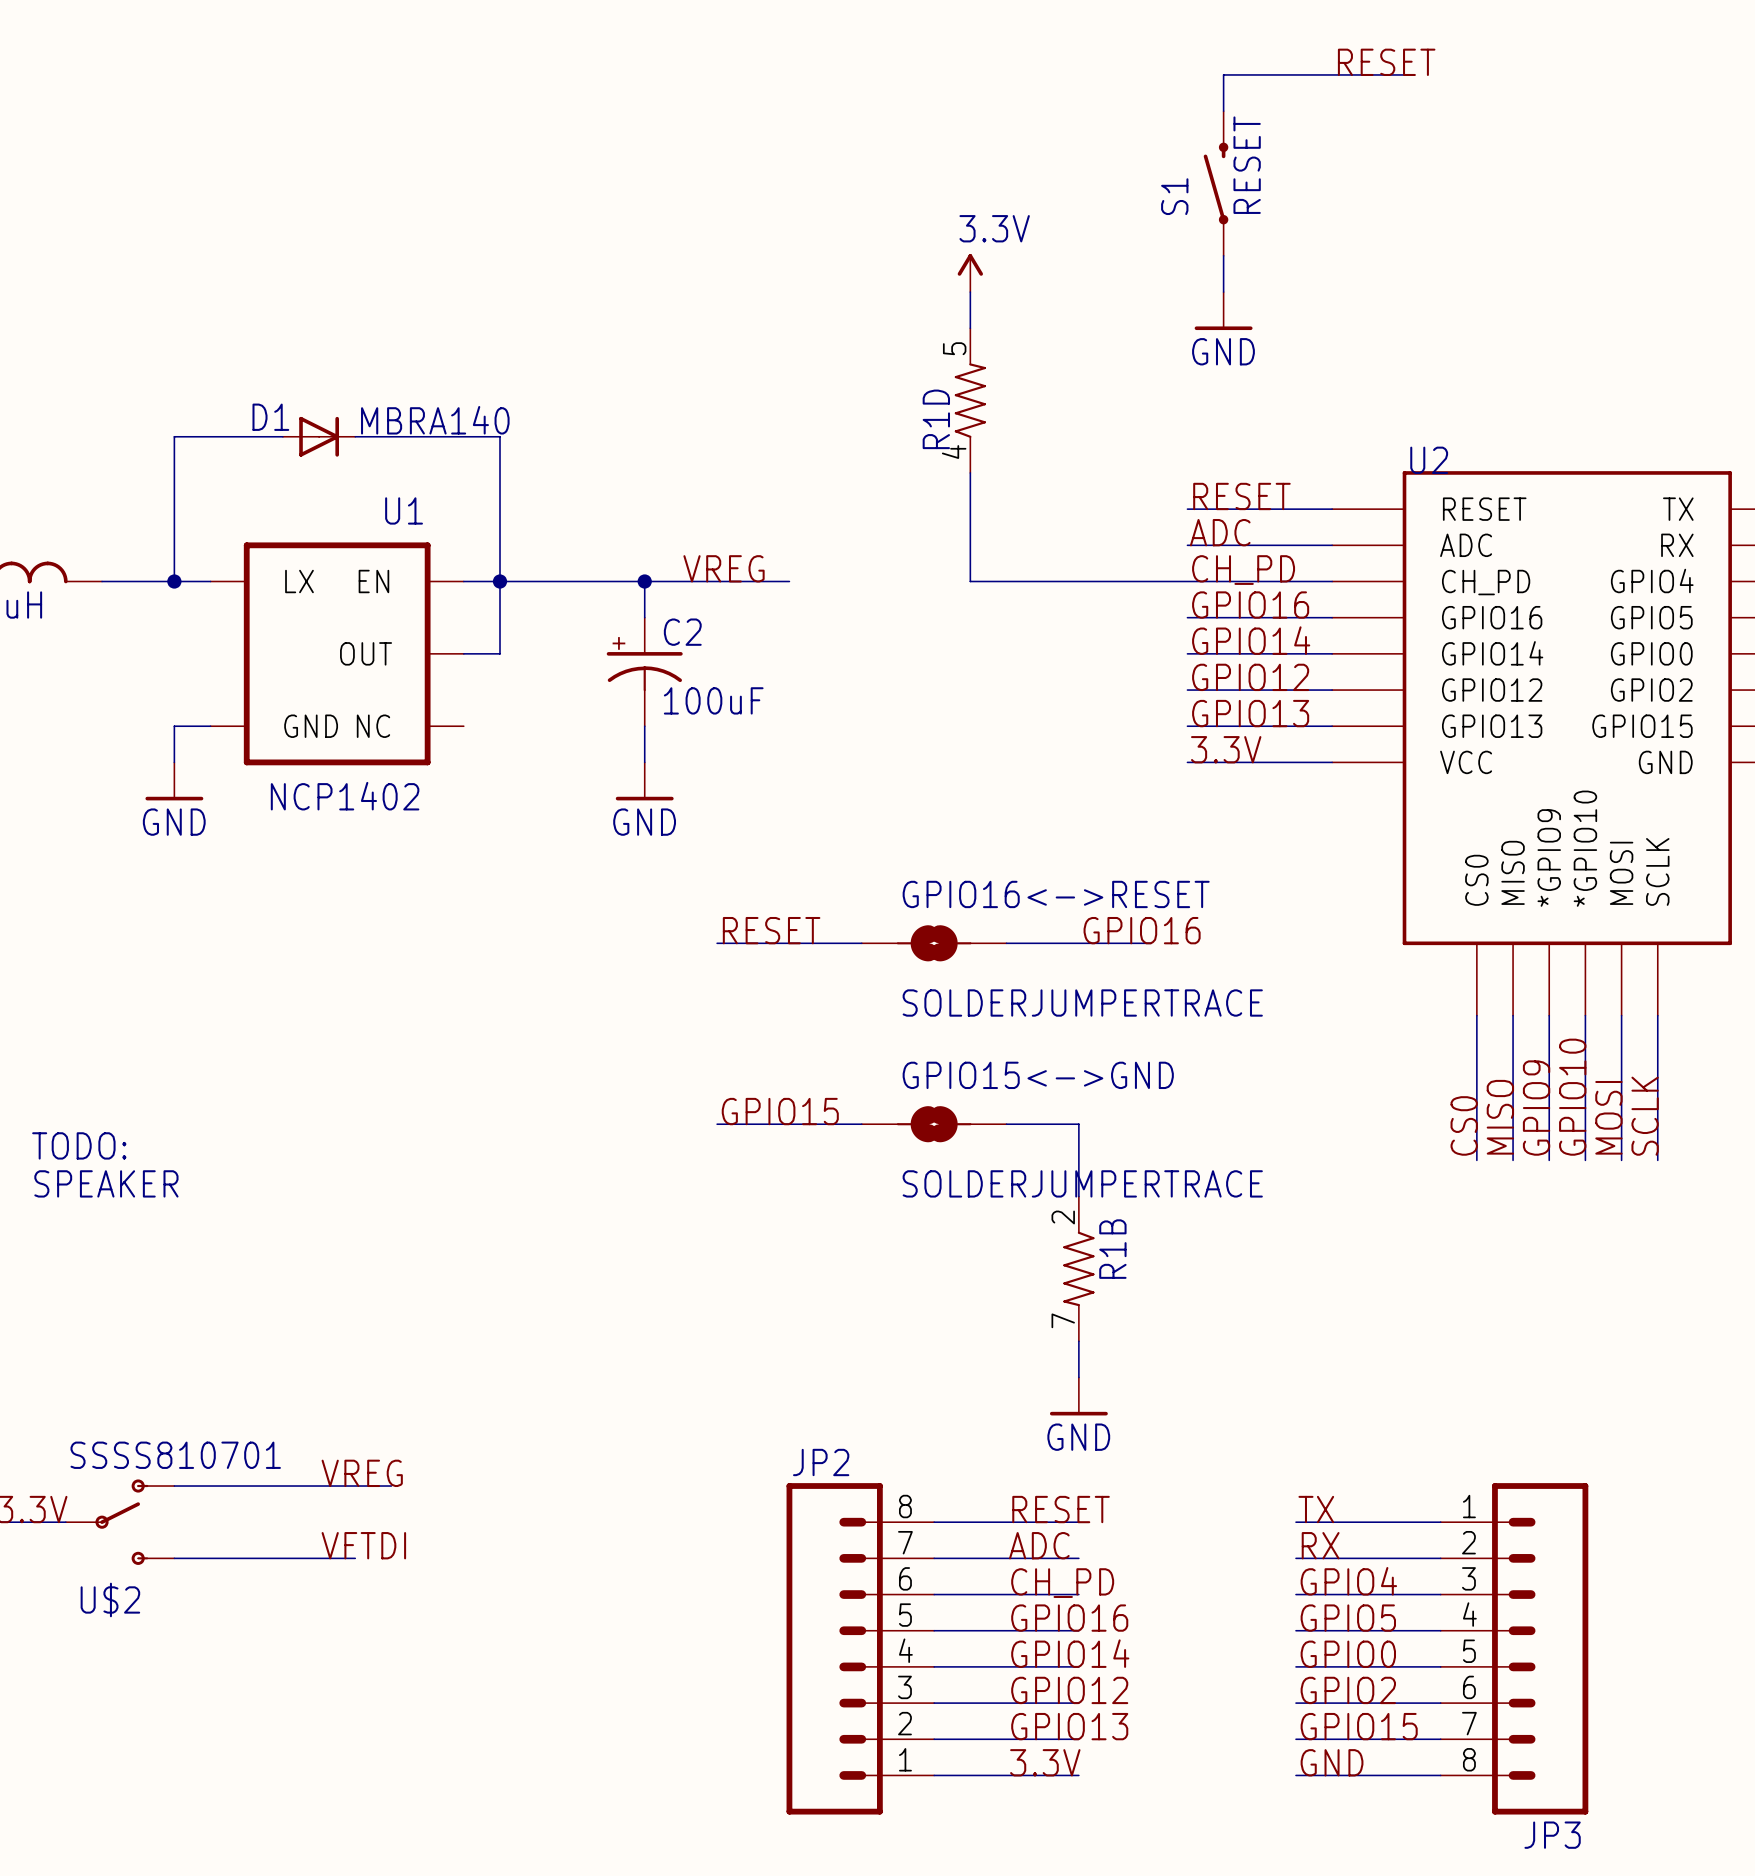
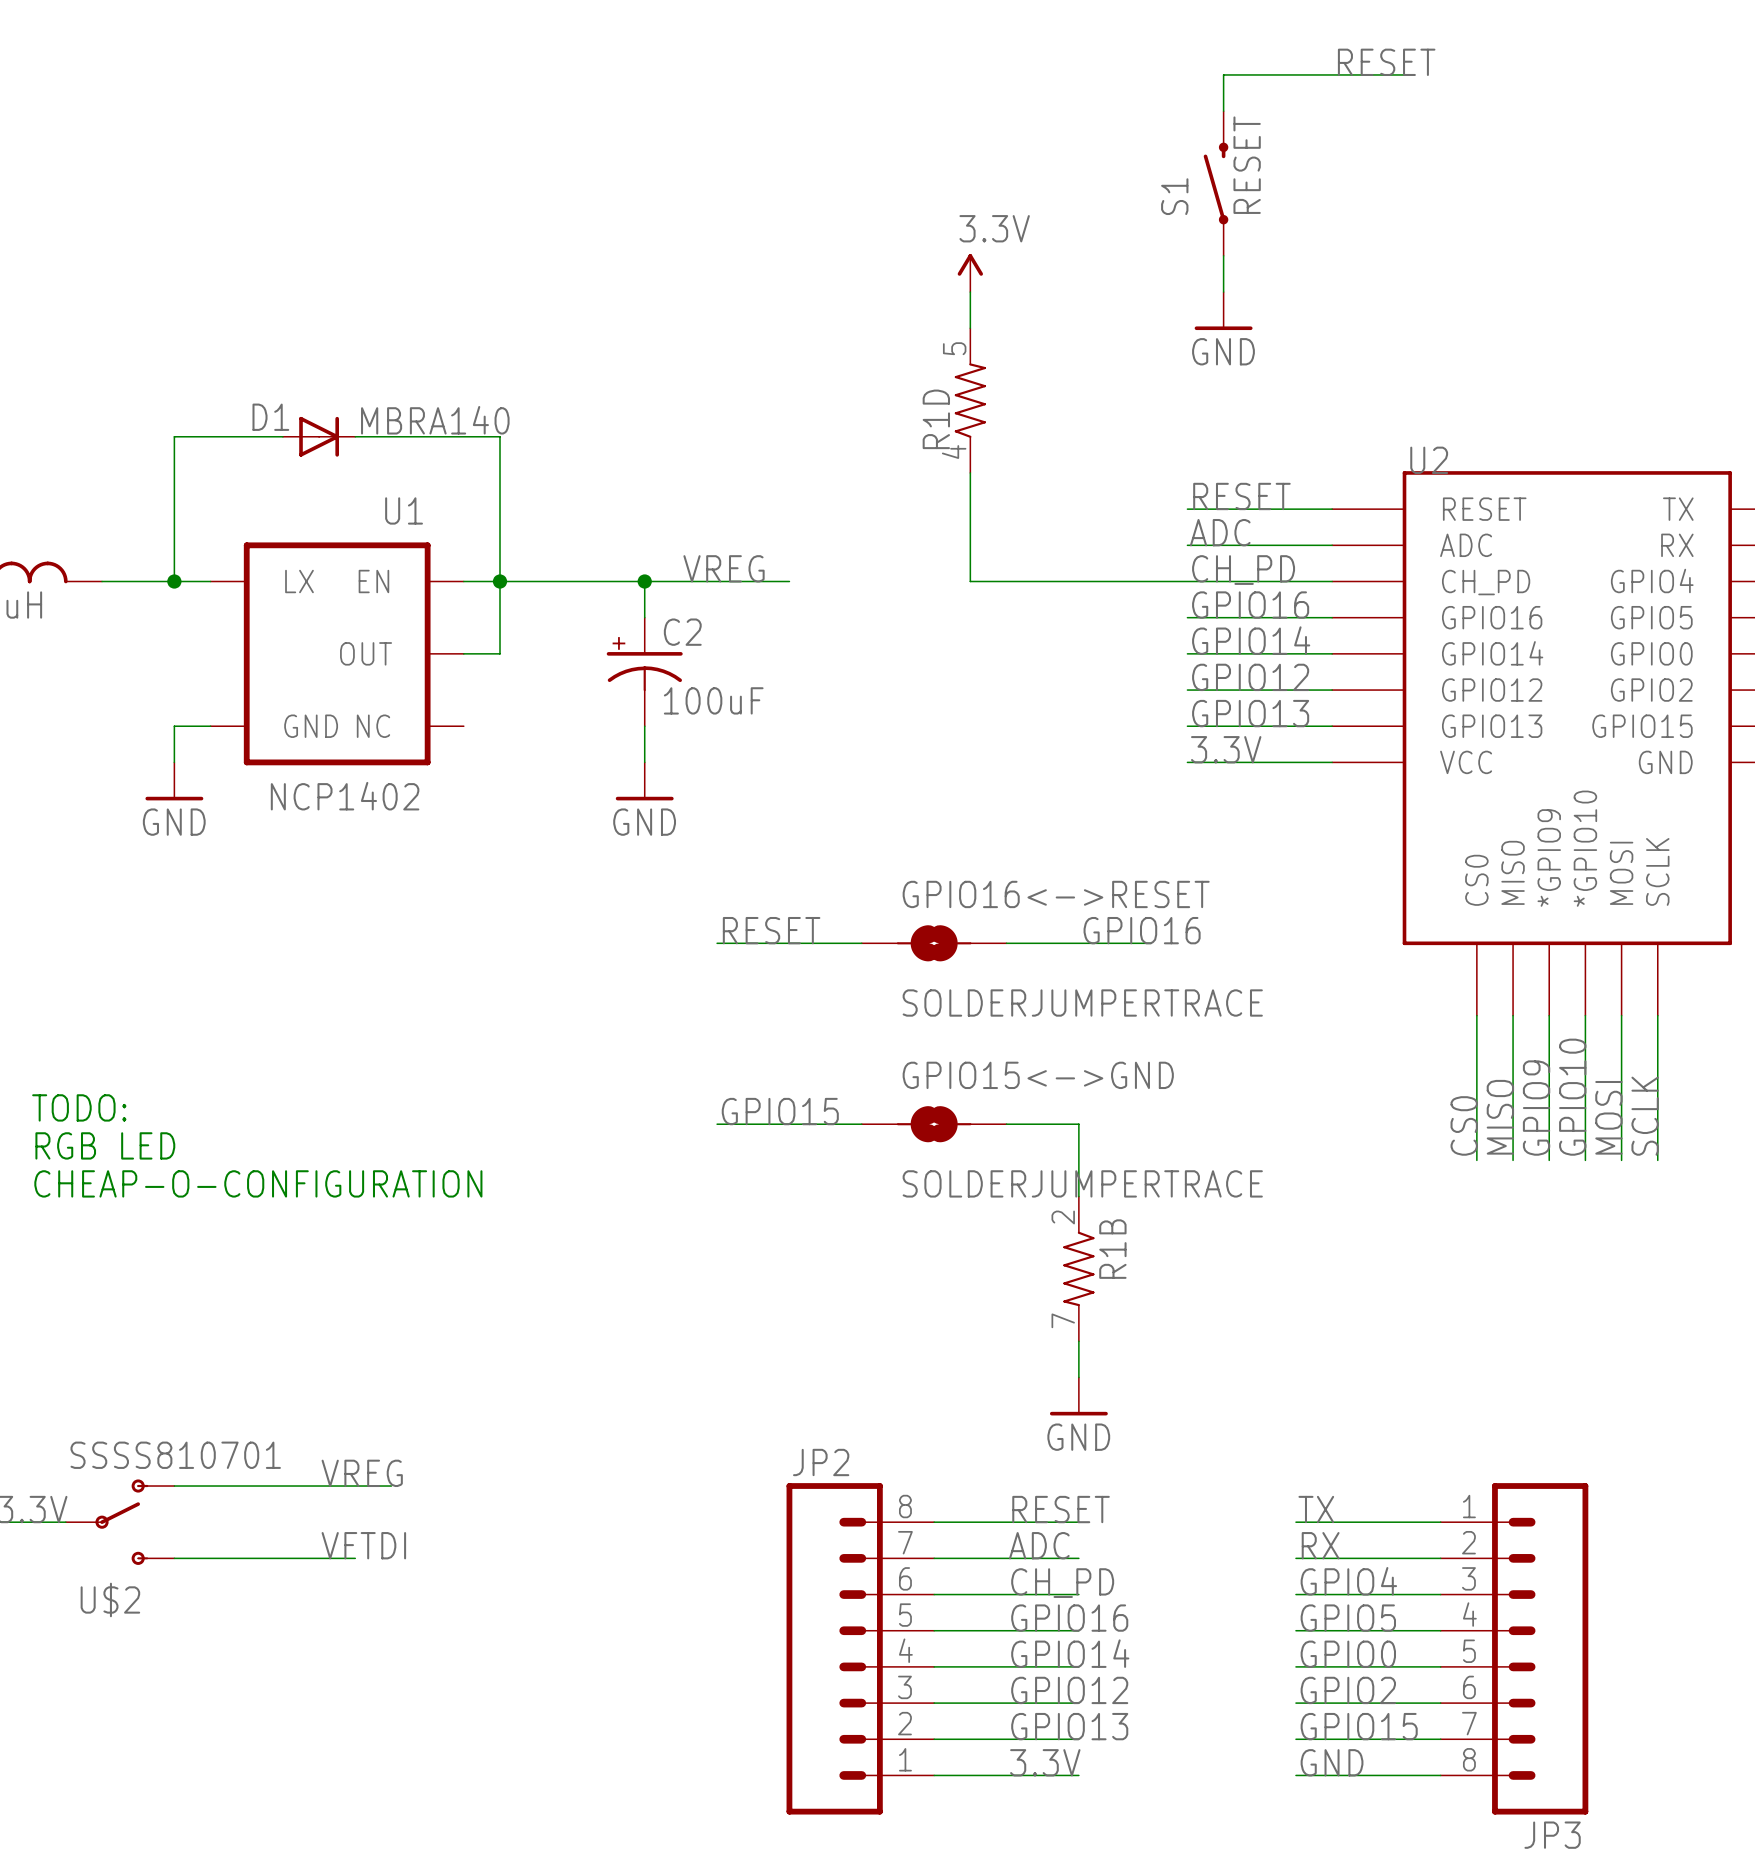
text: none -> TODO: (79, 1107)
text: TODO: (79, 1145) -> RGB LED (105, 1145)
text: SPEAKER (106, 1183) -> CHEAP-O-CONFIGURATION (258, 1183)

